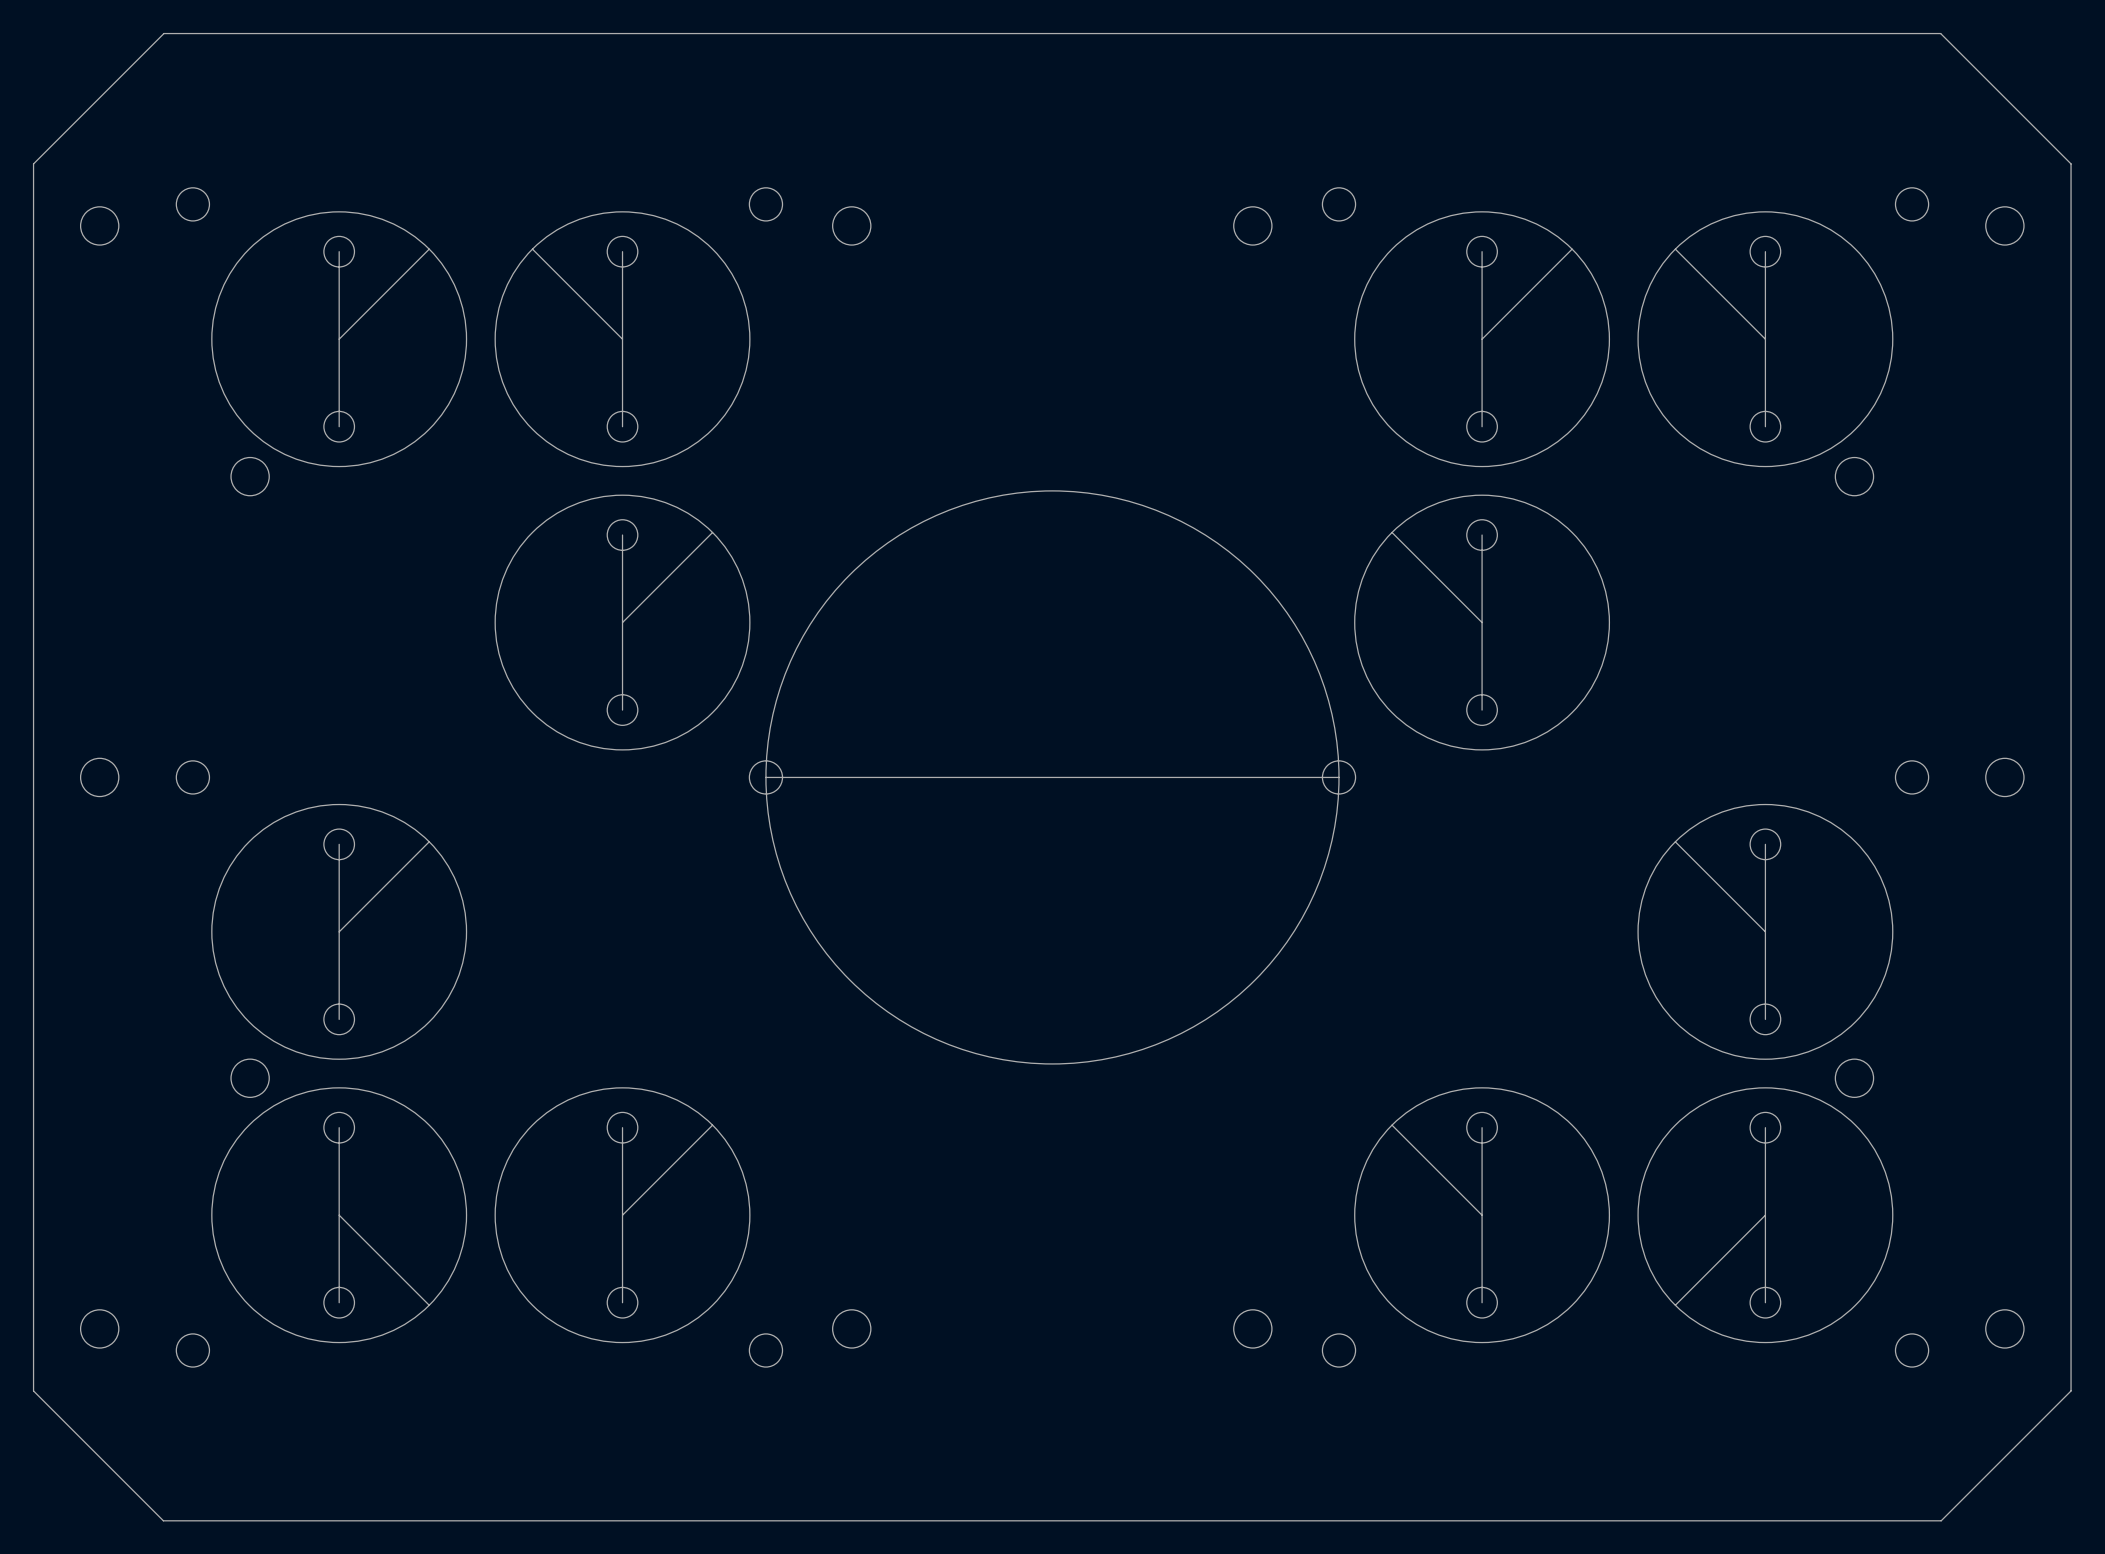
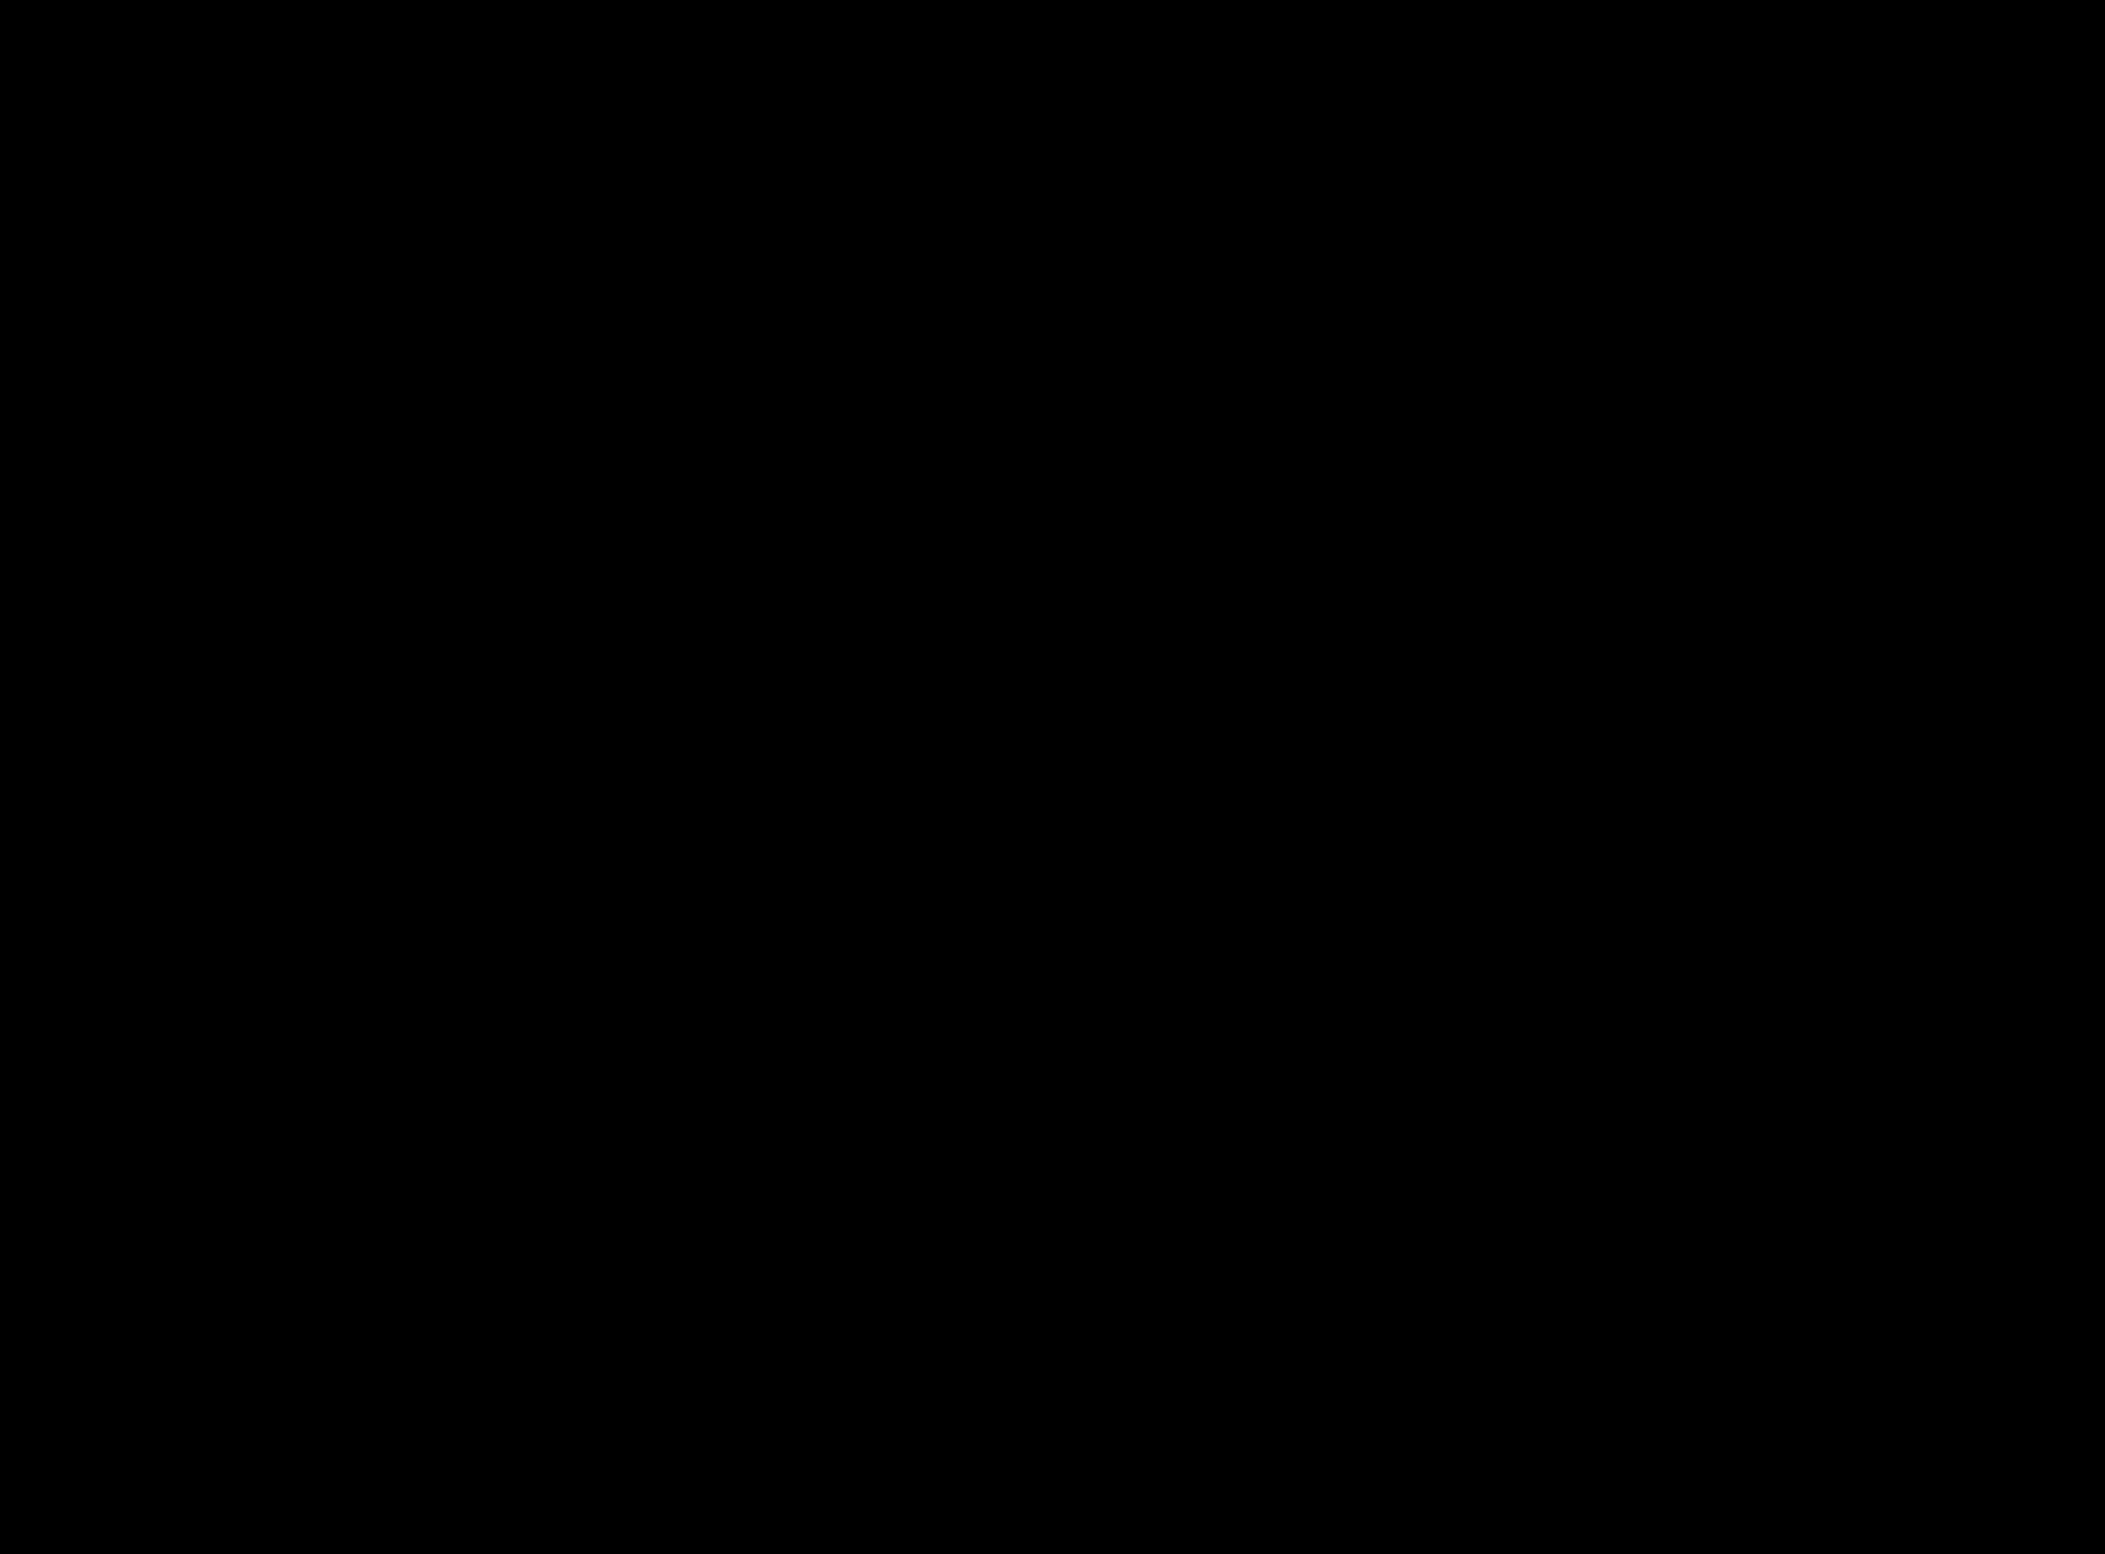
line: (163, 33) (33, 163) (33, 1390) (163, 1520) (1941, 1520) (2071, 1390) (2071, 163) (1940, 33) (163, 33) -> none
drawing: [175, 187, 467, 497] -> none
drawing: [494, 187, 783, 467] -> none
drawing: [1322, 187, 1610, 467] -> none
drawing: [1637, 187, 1929, 497] -> none
drawing: [80, 206, 120, 246] -> none
drawing: [832, 206, 872, 246] -> none
drawing: [1233, 206, 1273, 246] -> none
drawing: [1985, 206, 2025, 246] -> none
line: (429, 249) (339, 339) -> none
line: (532, 249) (622, 339) -> none
line: (1572, 249) (1482, 339) -> none
line: (1675, 249) (1765, 339) -> none
line: (339, 251) (339, 426) -> none
line: (622, 251) (622, 426) -> none
line: (1482, 251) (1482, 426) -> none
line: (1765, 251) (1765, 426) -> none
drawing: [494, 490, 1610, 1065] -> none
line: (712, 532) (622, 622) -> none
line: (1392, 532) (1482, 622) -> none
line: (622, 535) (622, 710) -> none
line: (1482, 535) (1482, 710) -> none
drawing: [80, 757, 120, 797] -> none
drawing: [1985, 757, 2025, 797] -> none
drawing: [175, 760, 467, 1368] -> none
drawing: [1637, 760, 1929, 1368] -> none
line: (765, 777) (1339, 777) -> none
line: (429, 841) (339, 931) -> none
line: (1675, 841) (1765, 931) -> none
line: (339, 844) (339, 1019) -> none
line: (1765, 844) (1765, 1019) -> none
drawing: [494, 1087, 783, 1368] -> none
drawing: [1322, 1087, 1610, 1368] -> none
line: (712, 1125) (622, 1215) -> none
line: (1392, 1125) (1482, 1215) -> none
line: (339, 1127) (339, 1302) -> none
line: (622, 1127) (622, 1302) -> none
line: (1482, 1127) (1482, 1302) -> none
line: (1765, 1127) (1765, 1302) -> none
line: (339, 1215) (429, 1305) -> none
line: (1765, 1215) (1675, 1305) -> none
drawing: [80, 1309, 120, 1349] -> none
drawing: [832, 1309, 872, 1349] -> none
drawing: [1233, 1309, 1273, 1349] -> none
drawing: [1985, 1309, 2025, 1349] -> none

